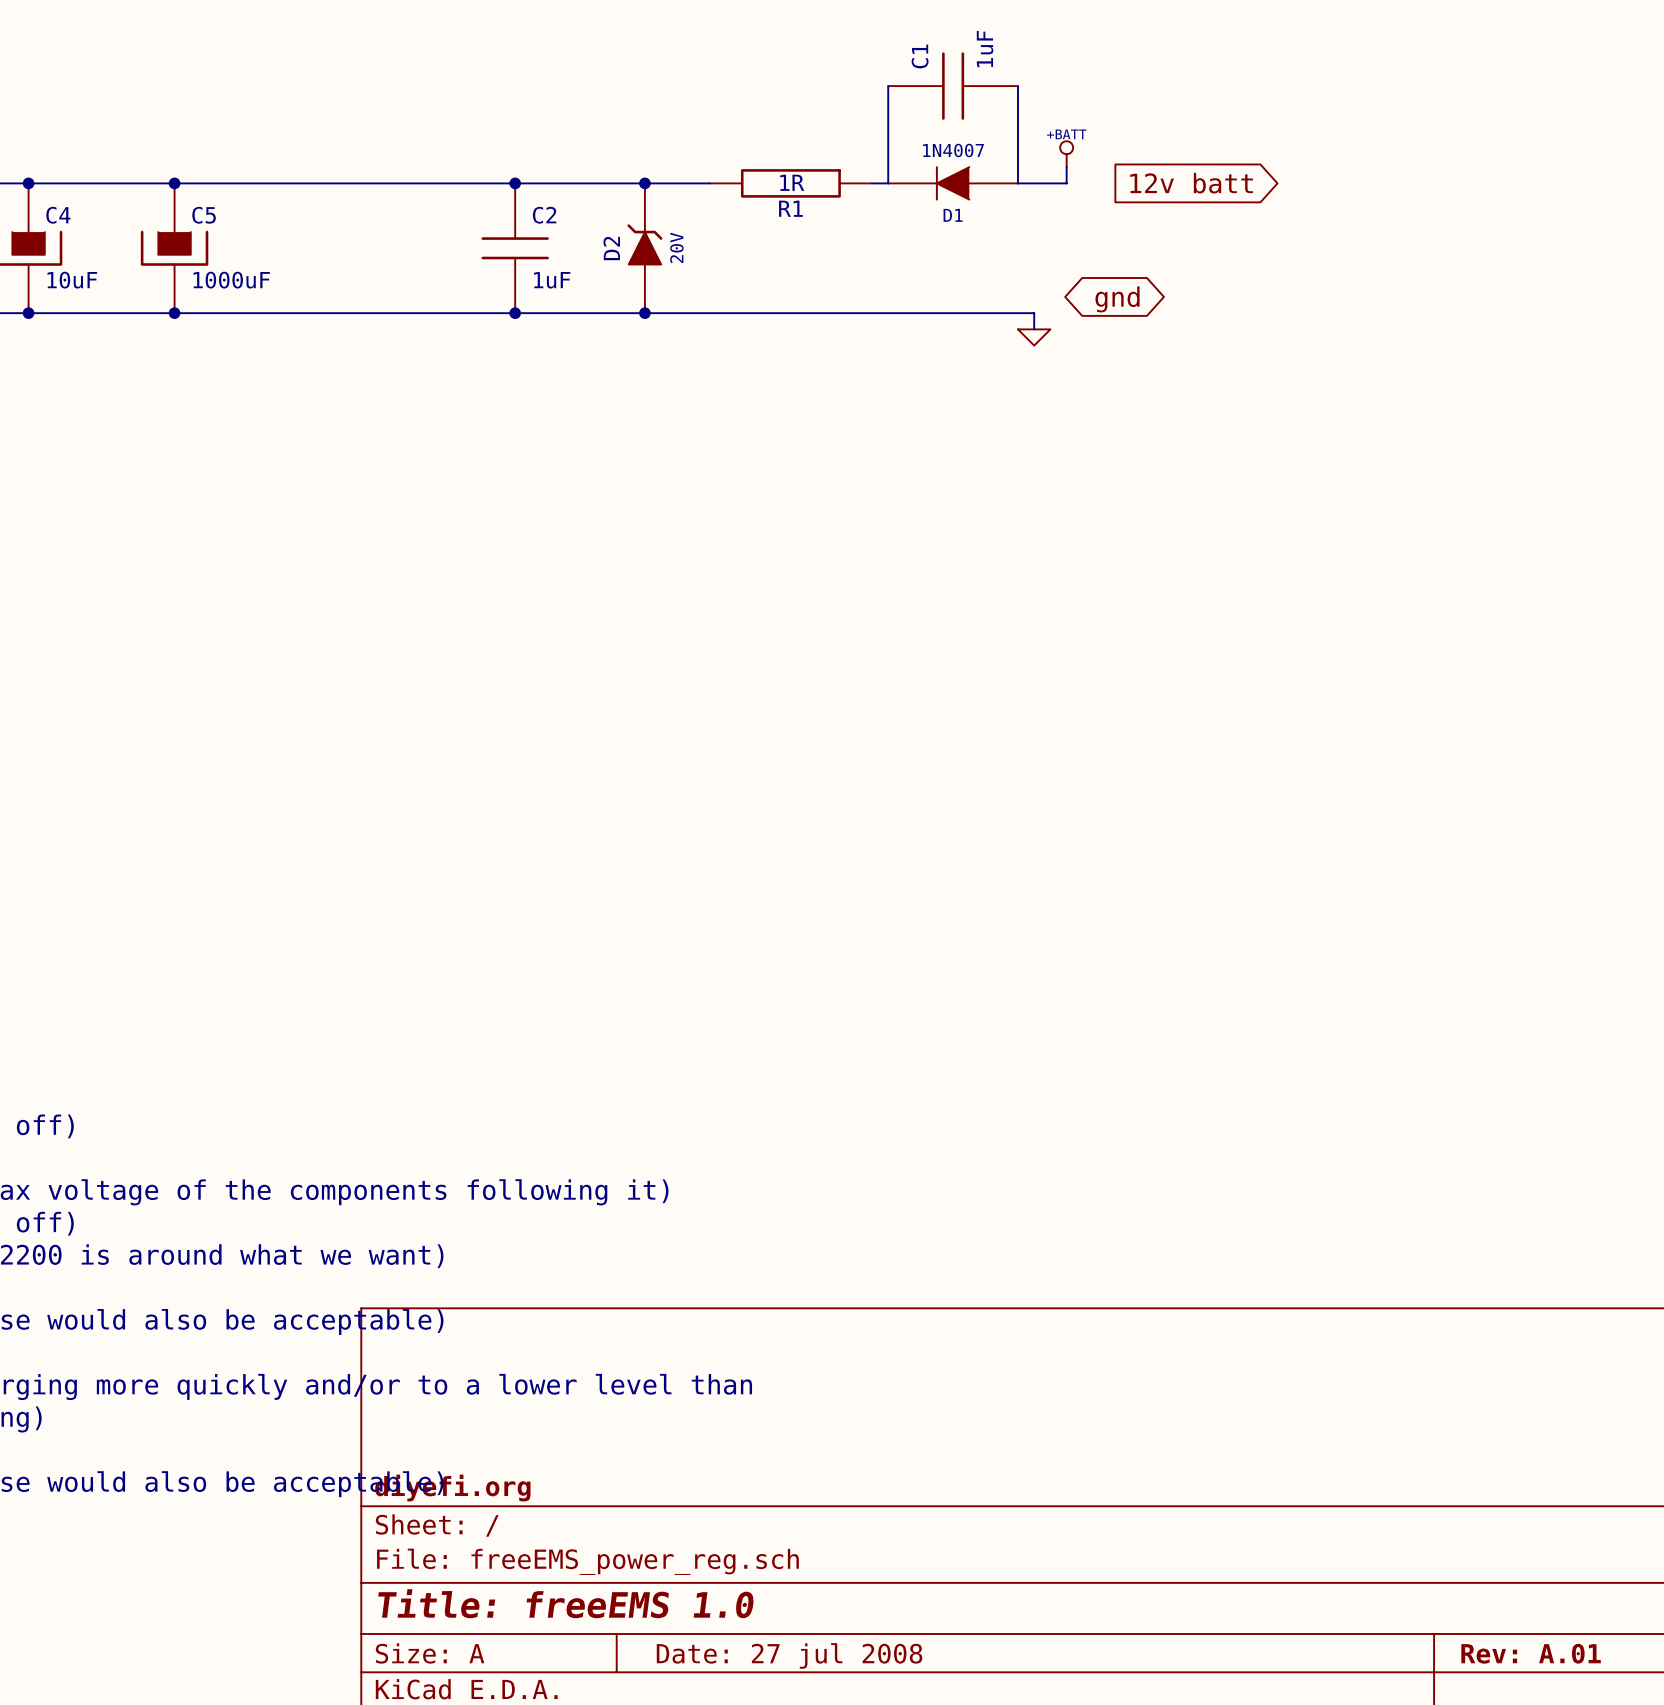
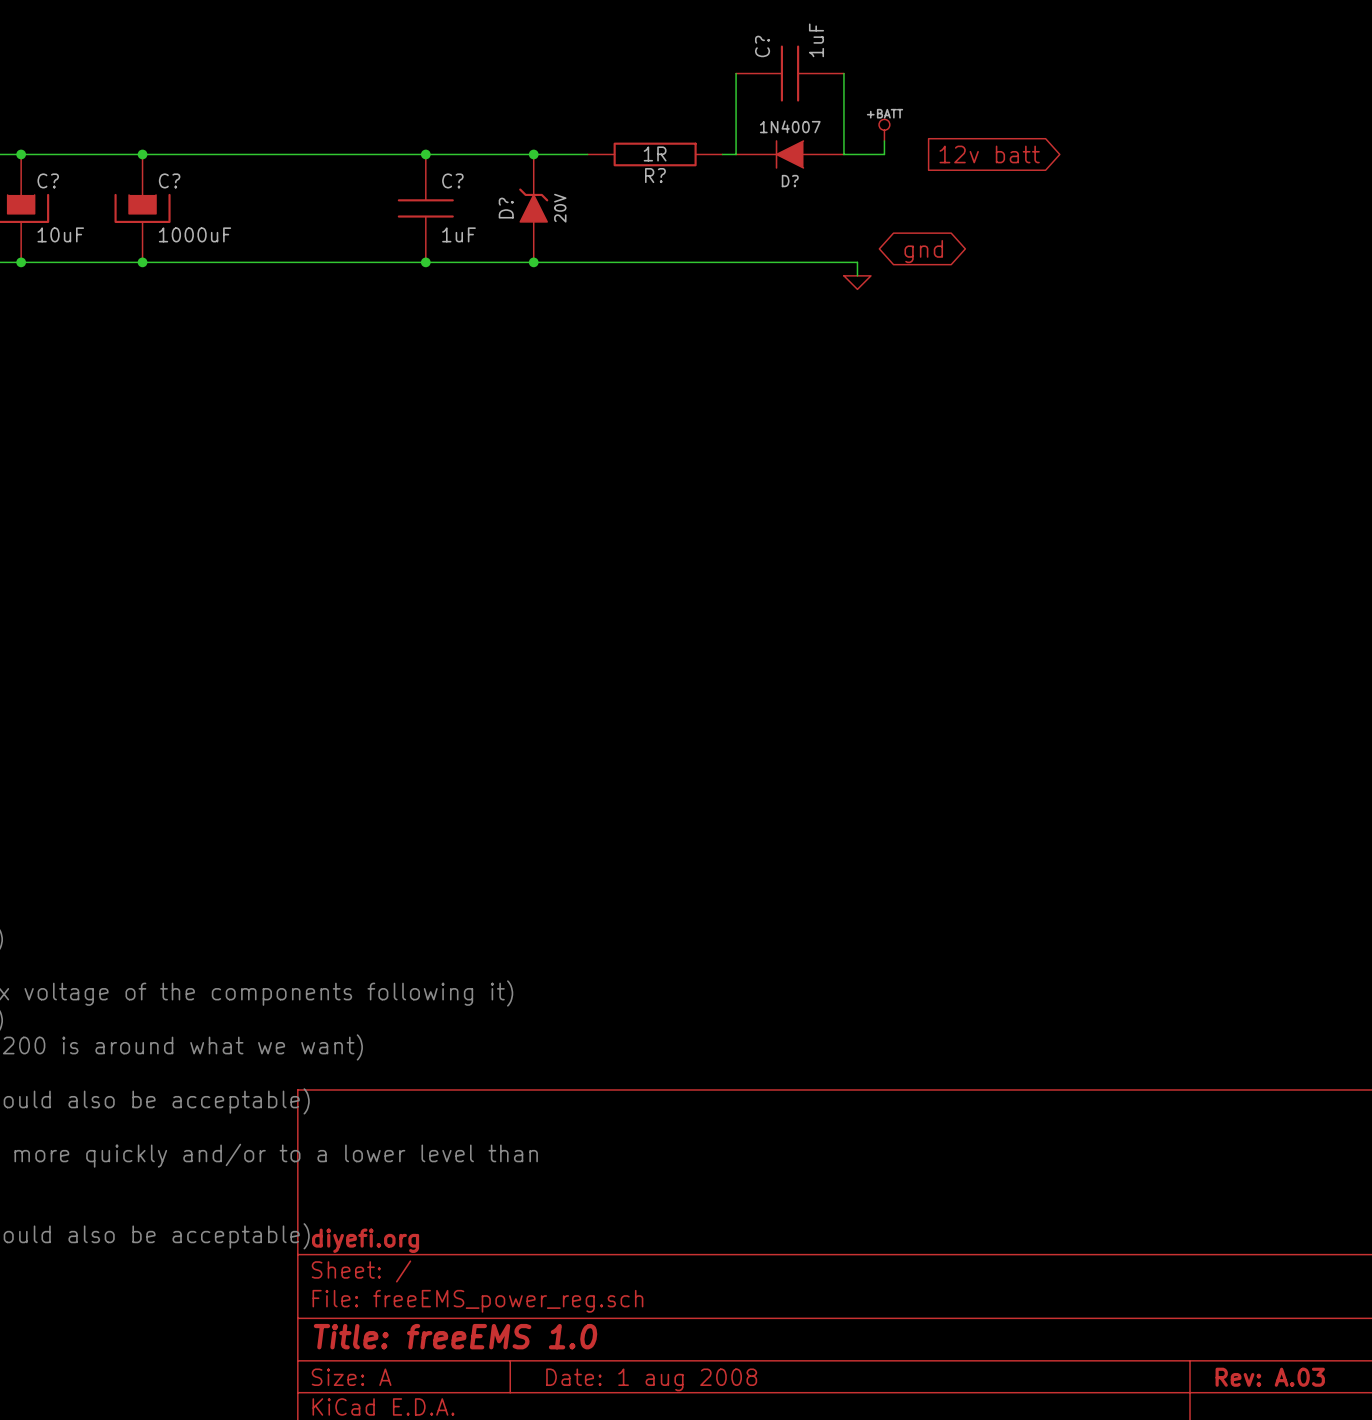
C1 name: C1 (920, 56) -> C? (762, 46)
R1 name: R1 (790, 208) -> R? (655, 175)
C4 name: C4 (58, 215) -> C? (48, 180)
C5 name: C5 (204, 215) -> C? (169, 180)
C2 name: C2 (544, 215) -> C? (452, 180)
D1 name: D1 (953, 215) -> D? (790, 181)
D2 name: D2 (611, 248) -> D? (506, 208)
title block: Rev: A.01 (1531, 1653) -> Rev: A.03 (1270, 1377)
title block: Date: 27 jul 2008 (789, 1655) -> Date: 1 aug 2008 (651, 1379)

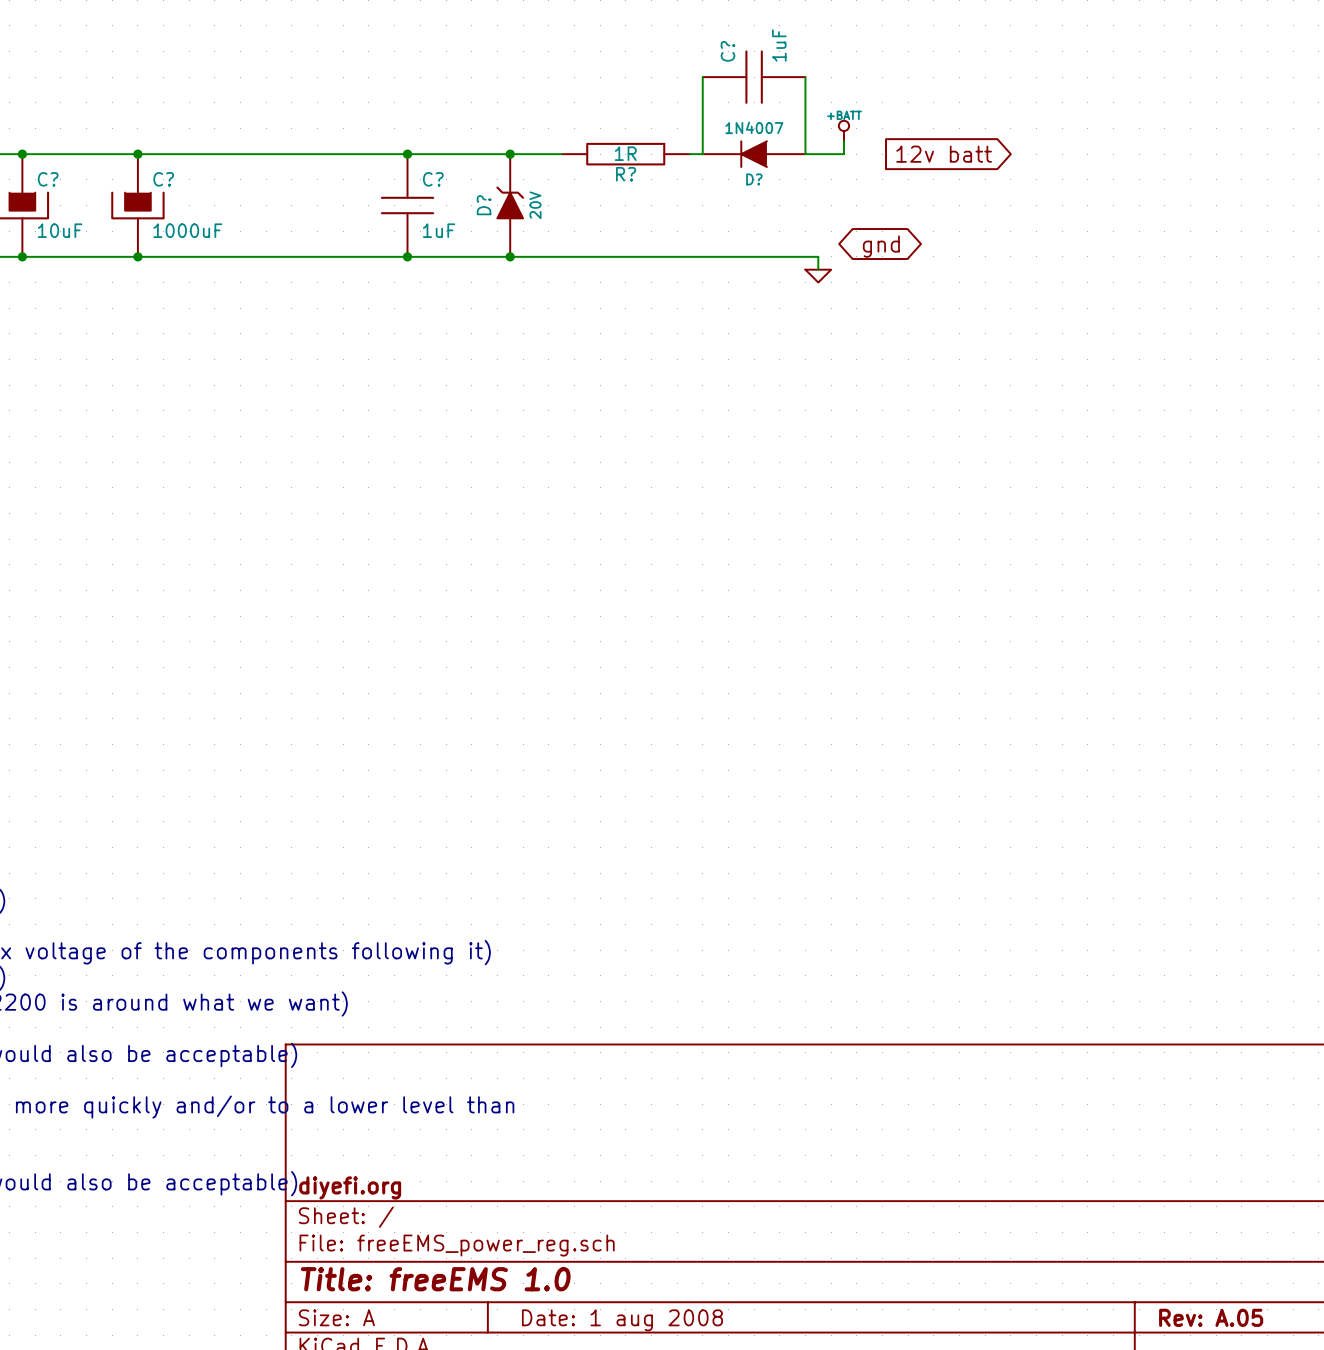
title block: Rev: A.03 (1270, 1377) -> Rev: A.05 (1211, 1317)

